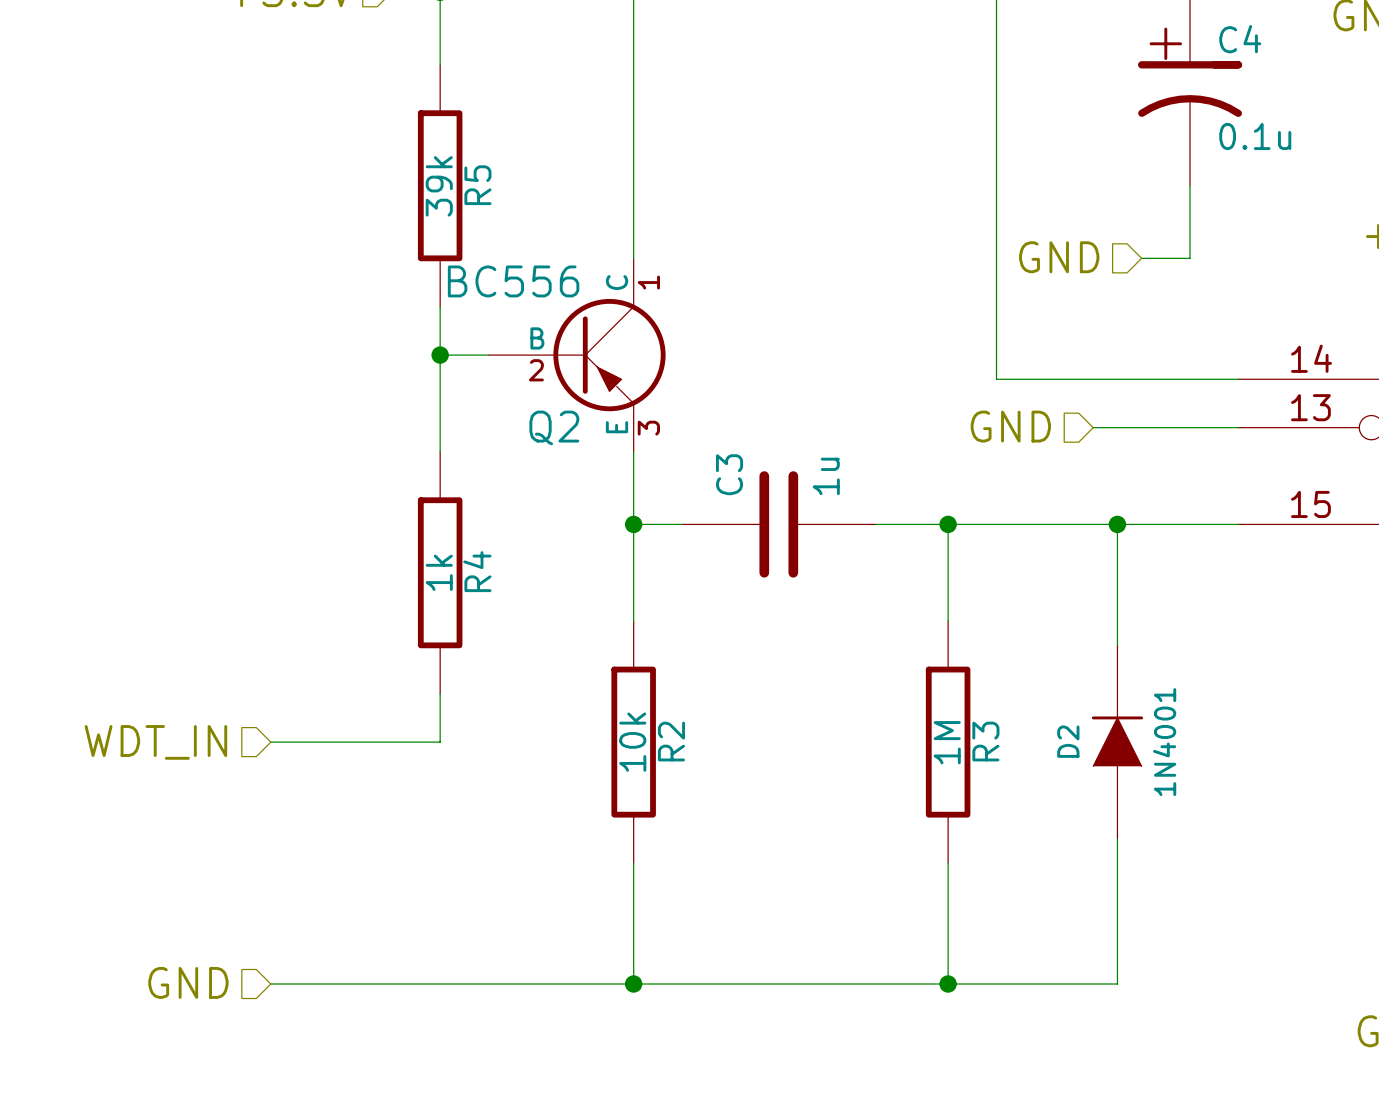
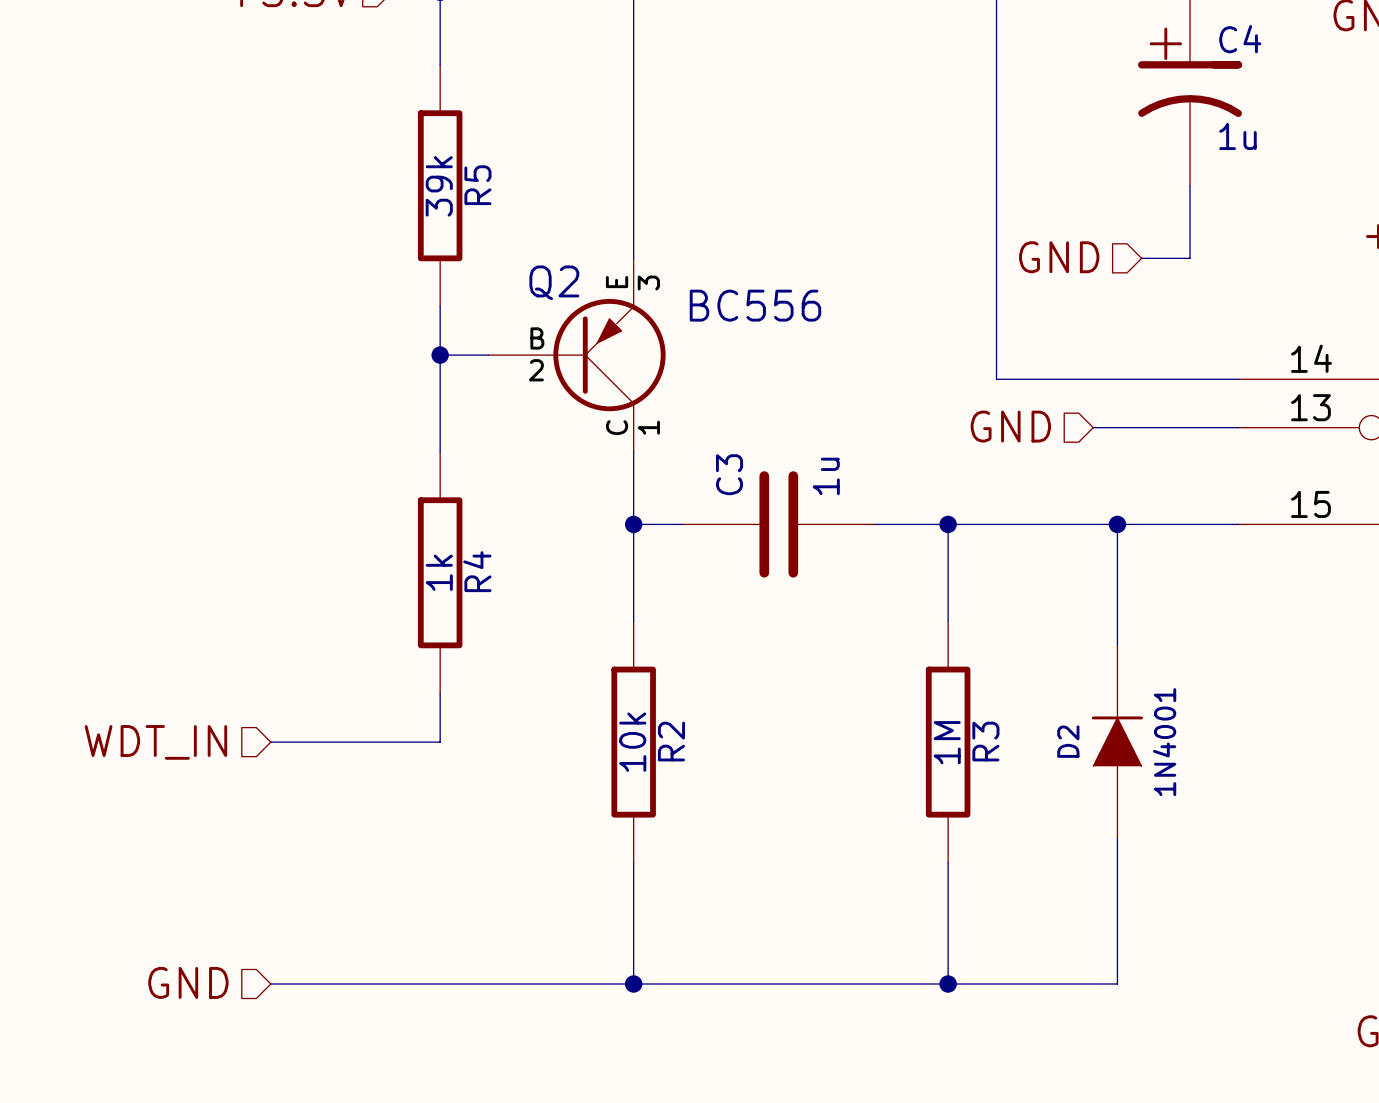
C4 value: 0.1u (1255, 136) -> 1u (1237, 136)
Q2 value position: BC556 (513, 281) -> BC556 (755, 305)
Q2 flip: as is (609, 355) -> up-down (609, 355)

